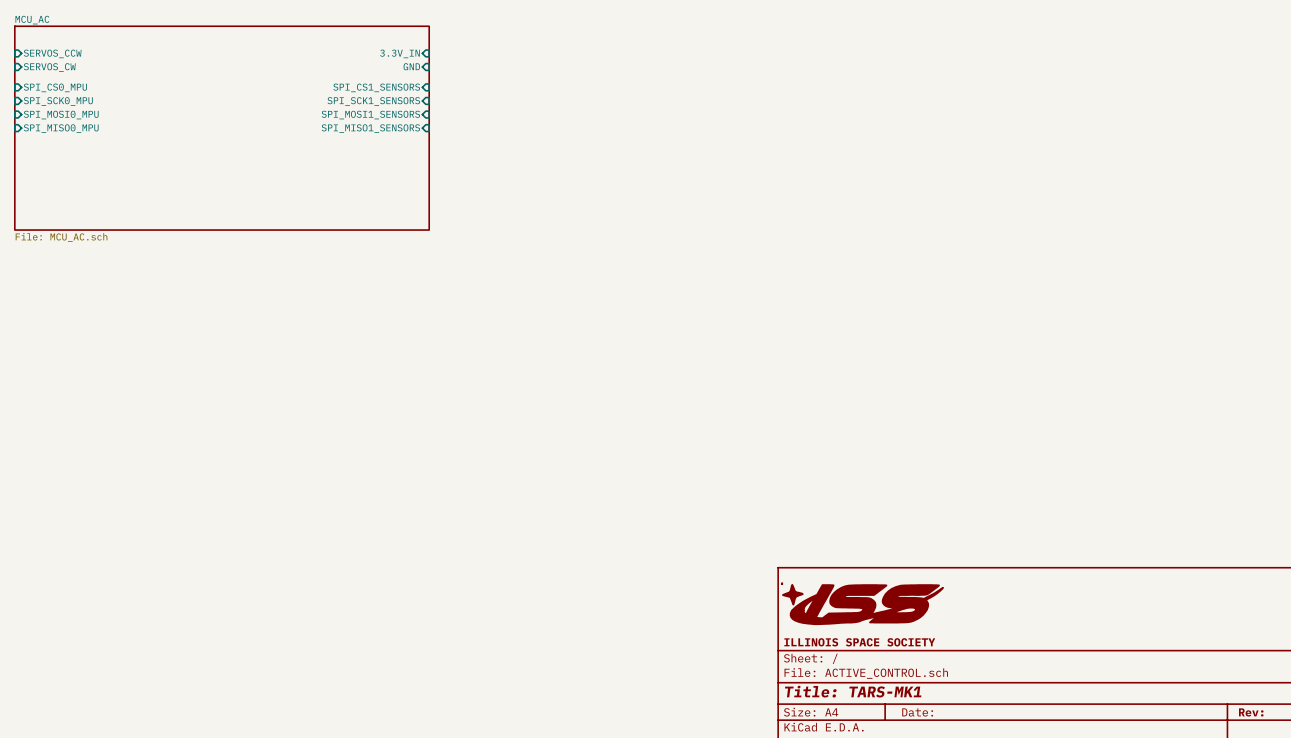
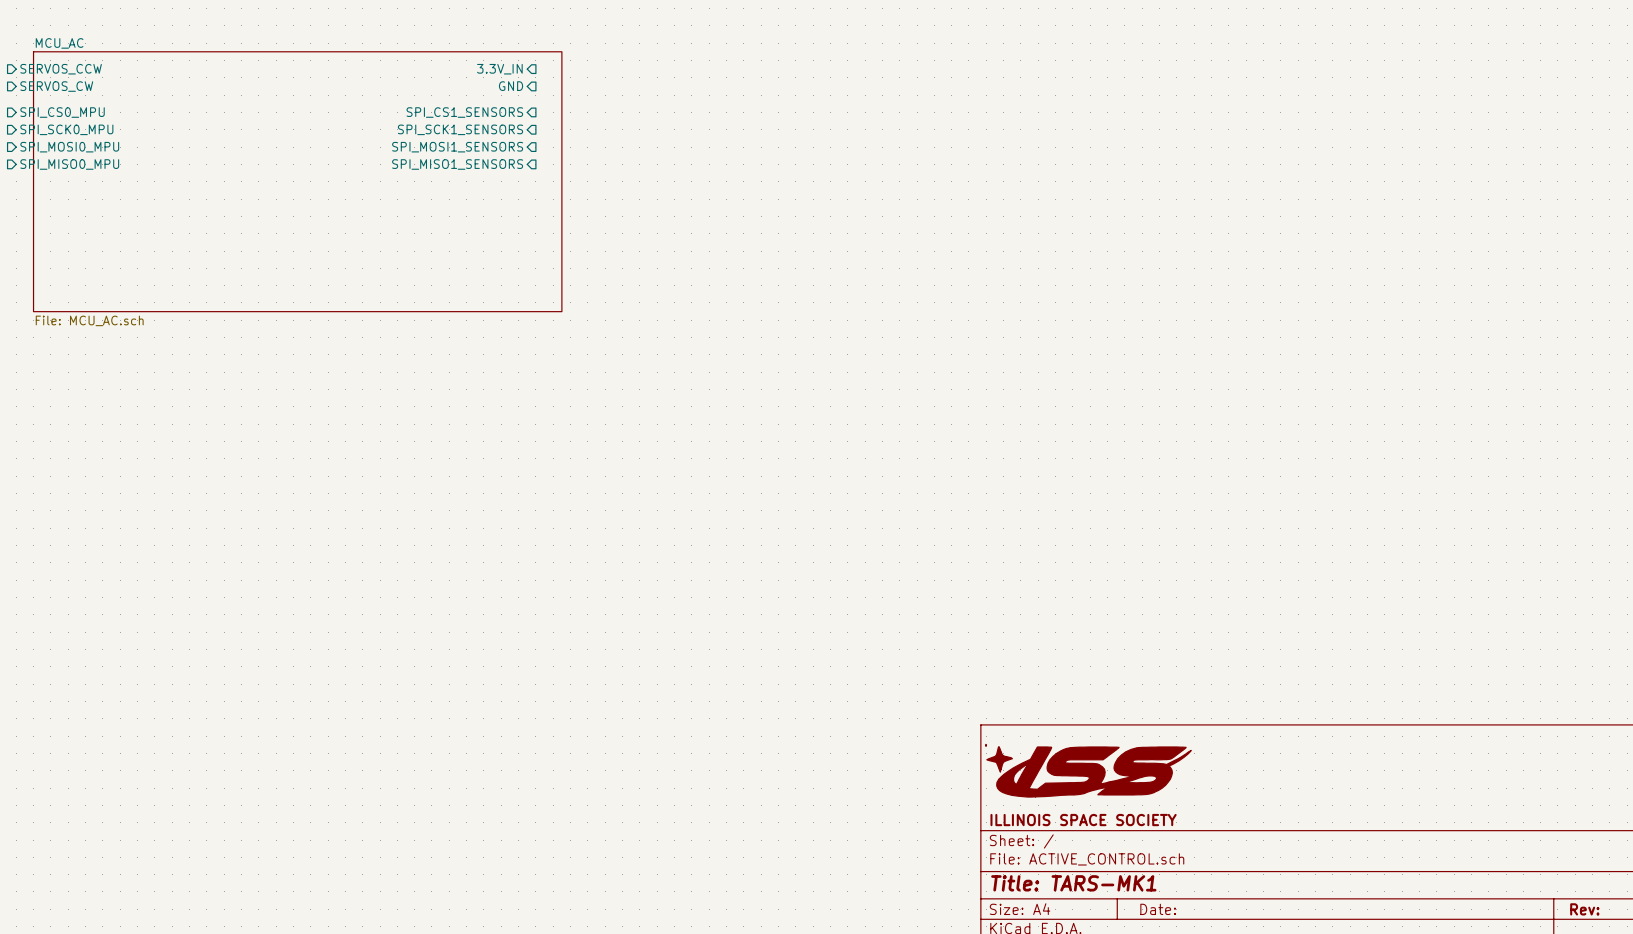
sheet MCU_AC position: (222, 128) -> (297, 181)

